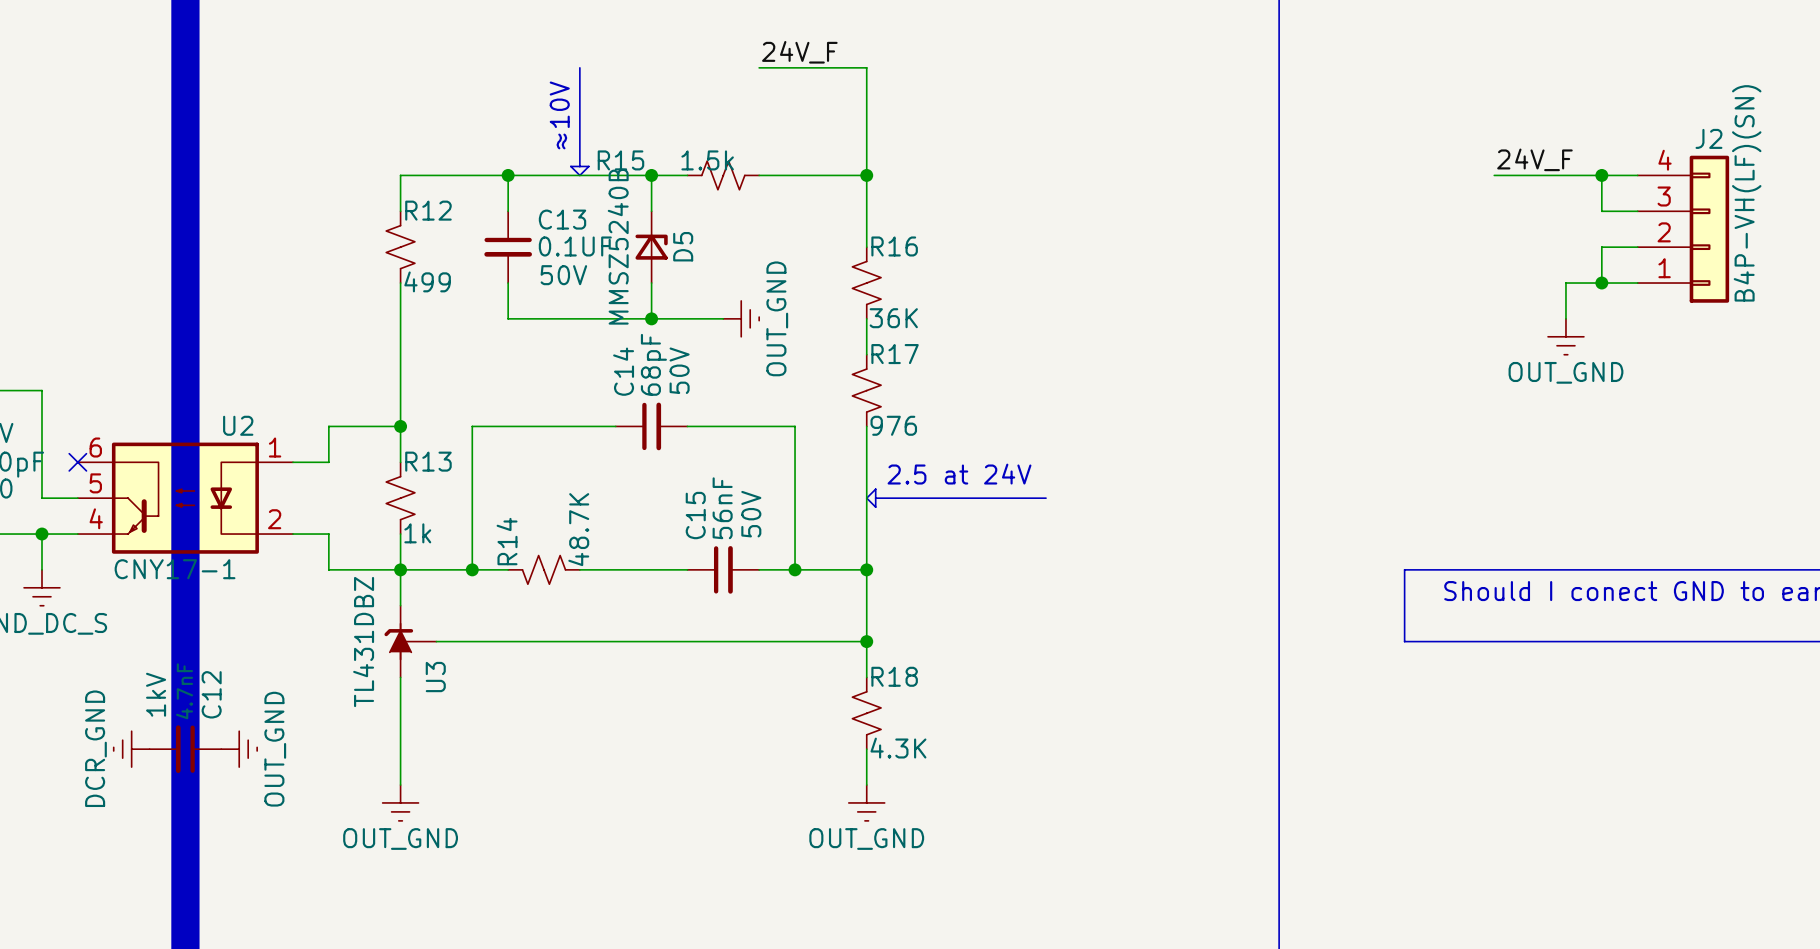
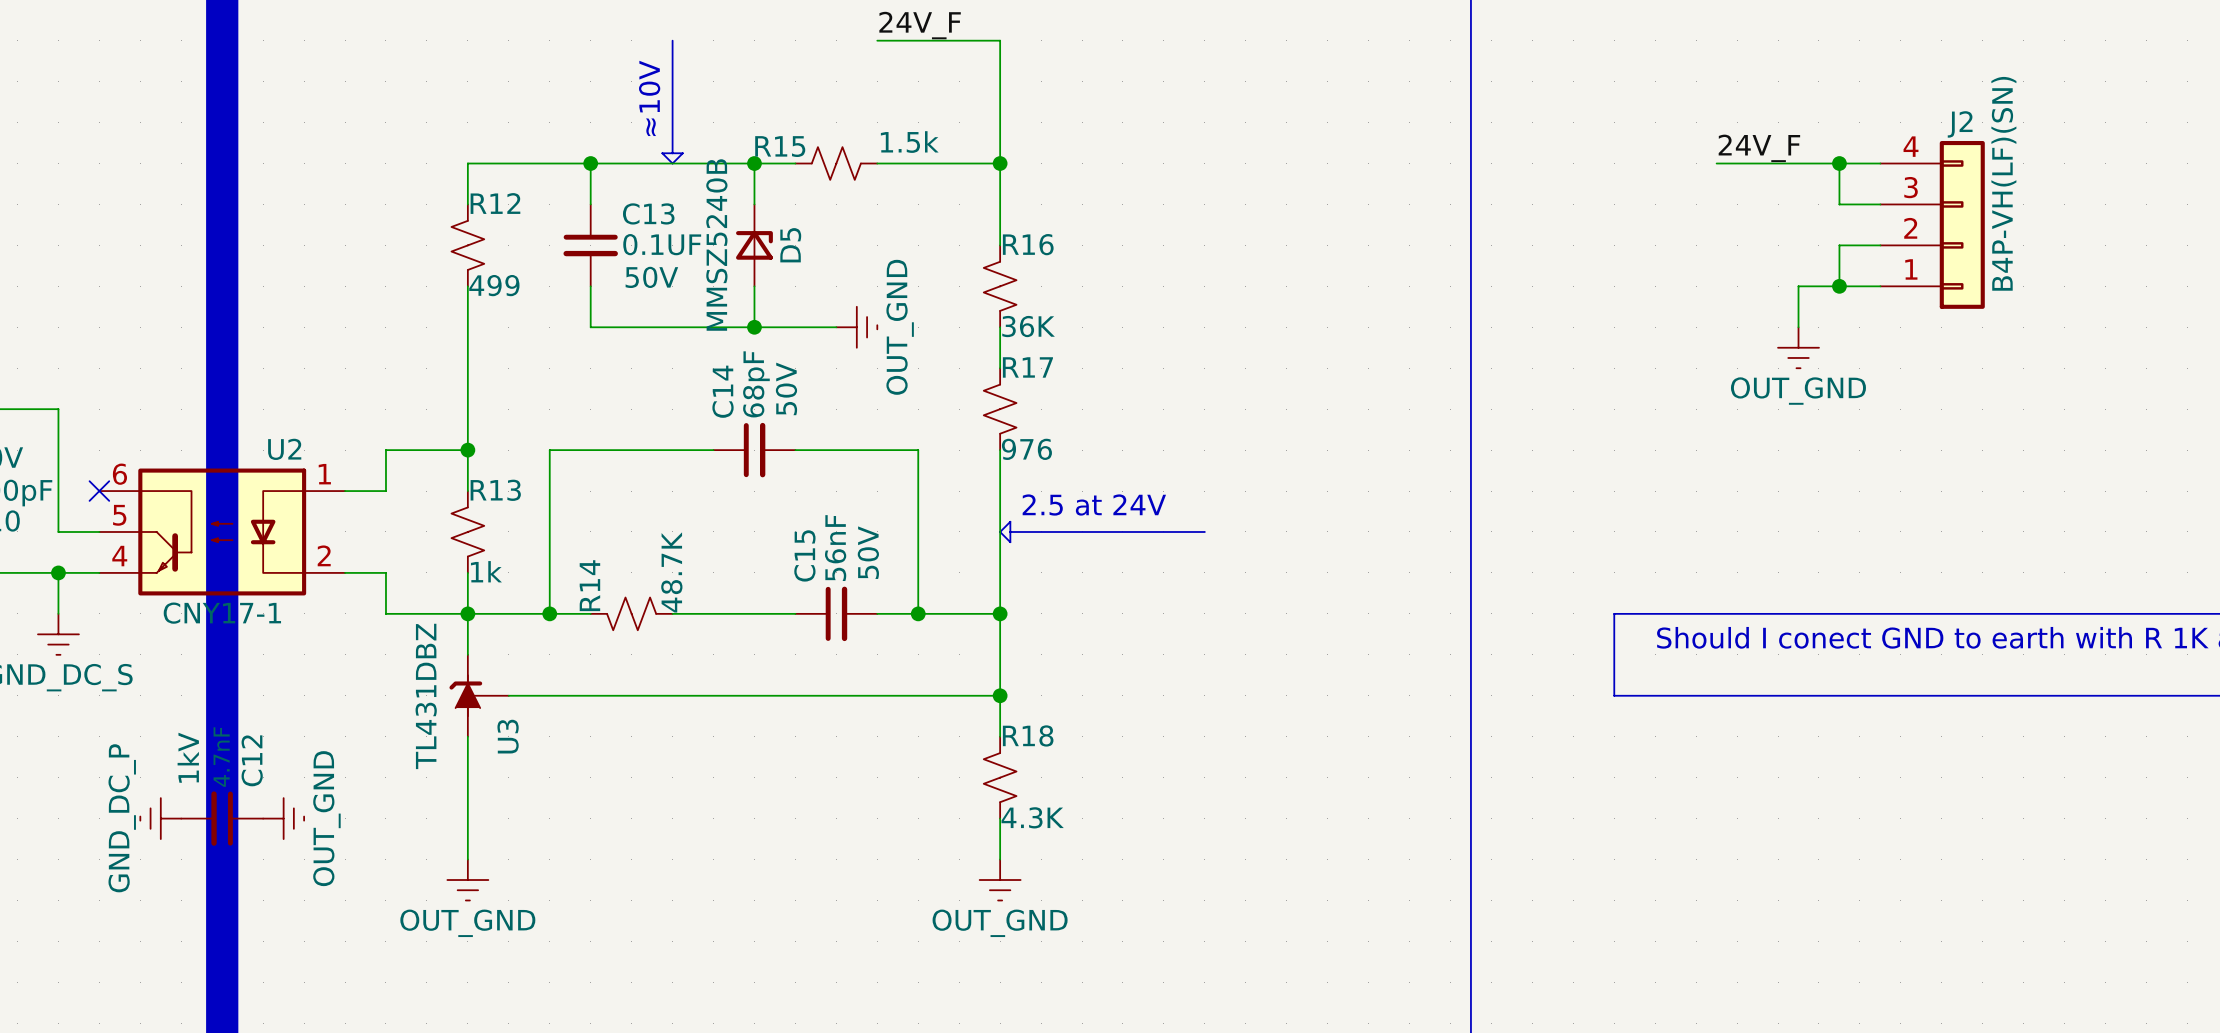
R15 name position: R15 (620, 160) -> R15 (780, 146)
R15 value position: 1.5k (707, 160) -> 1.5k (909, 142)
power symbol: DCR_GND (131, 749) -> GND_DC_P (160, 818)

